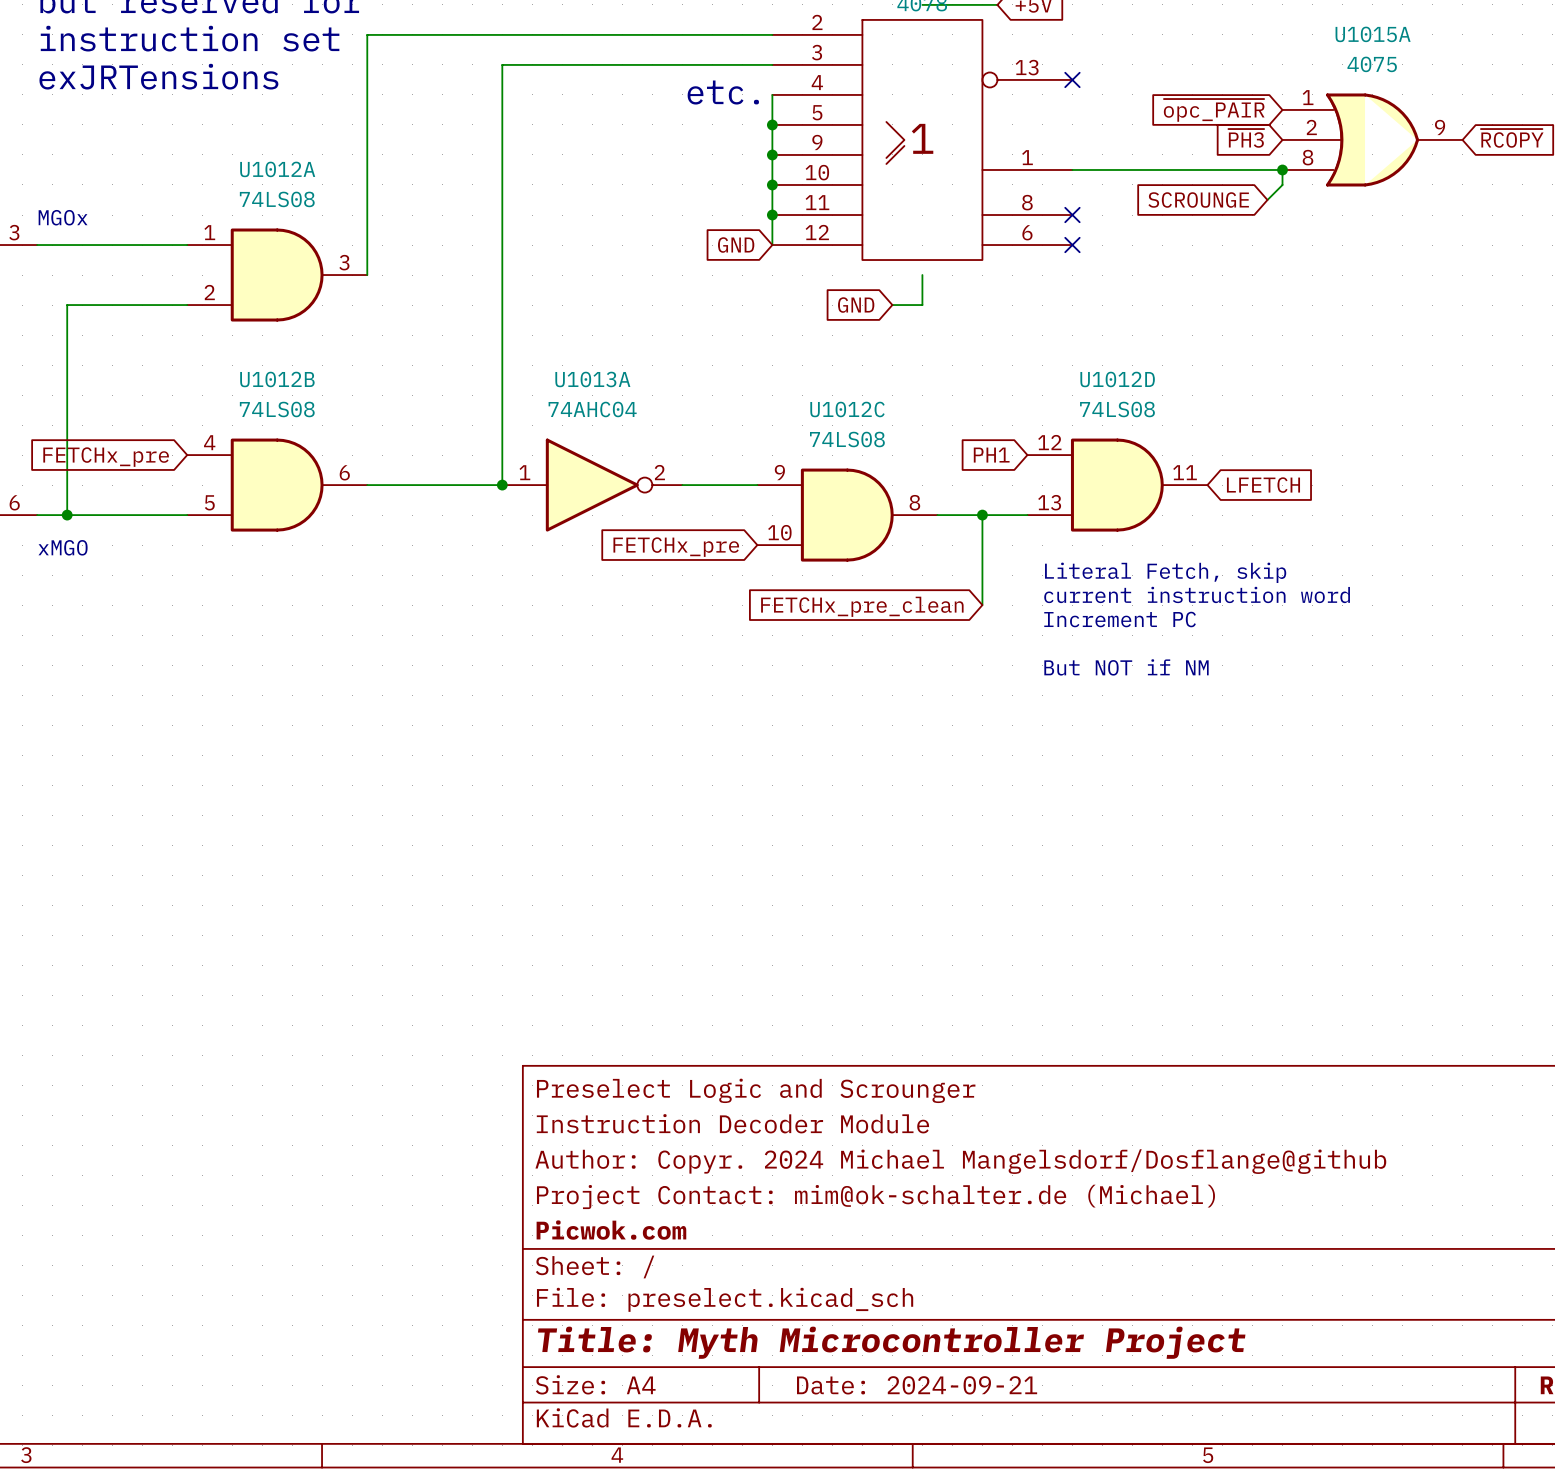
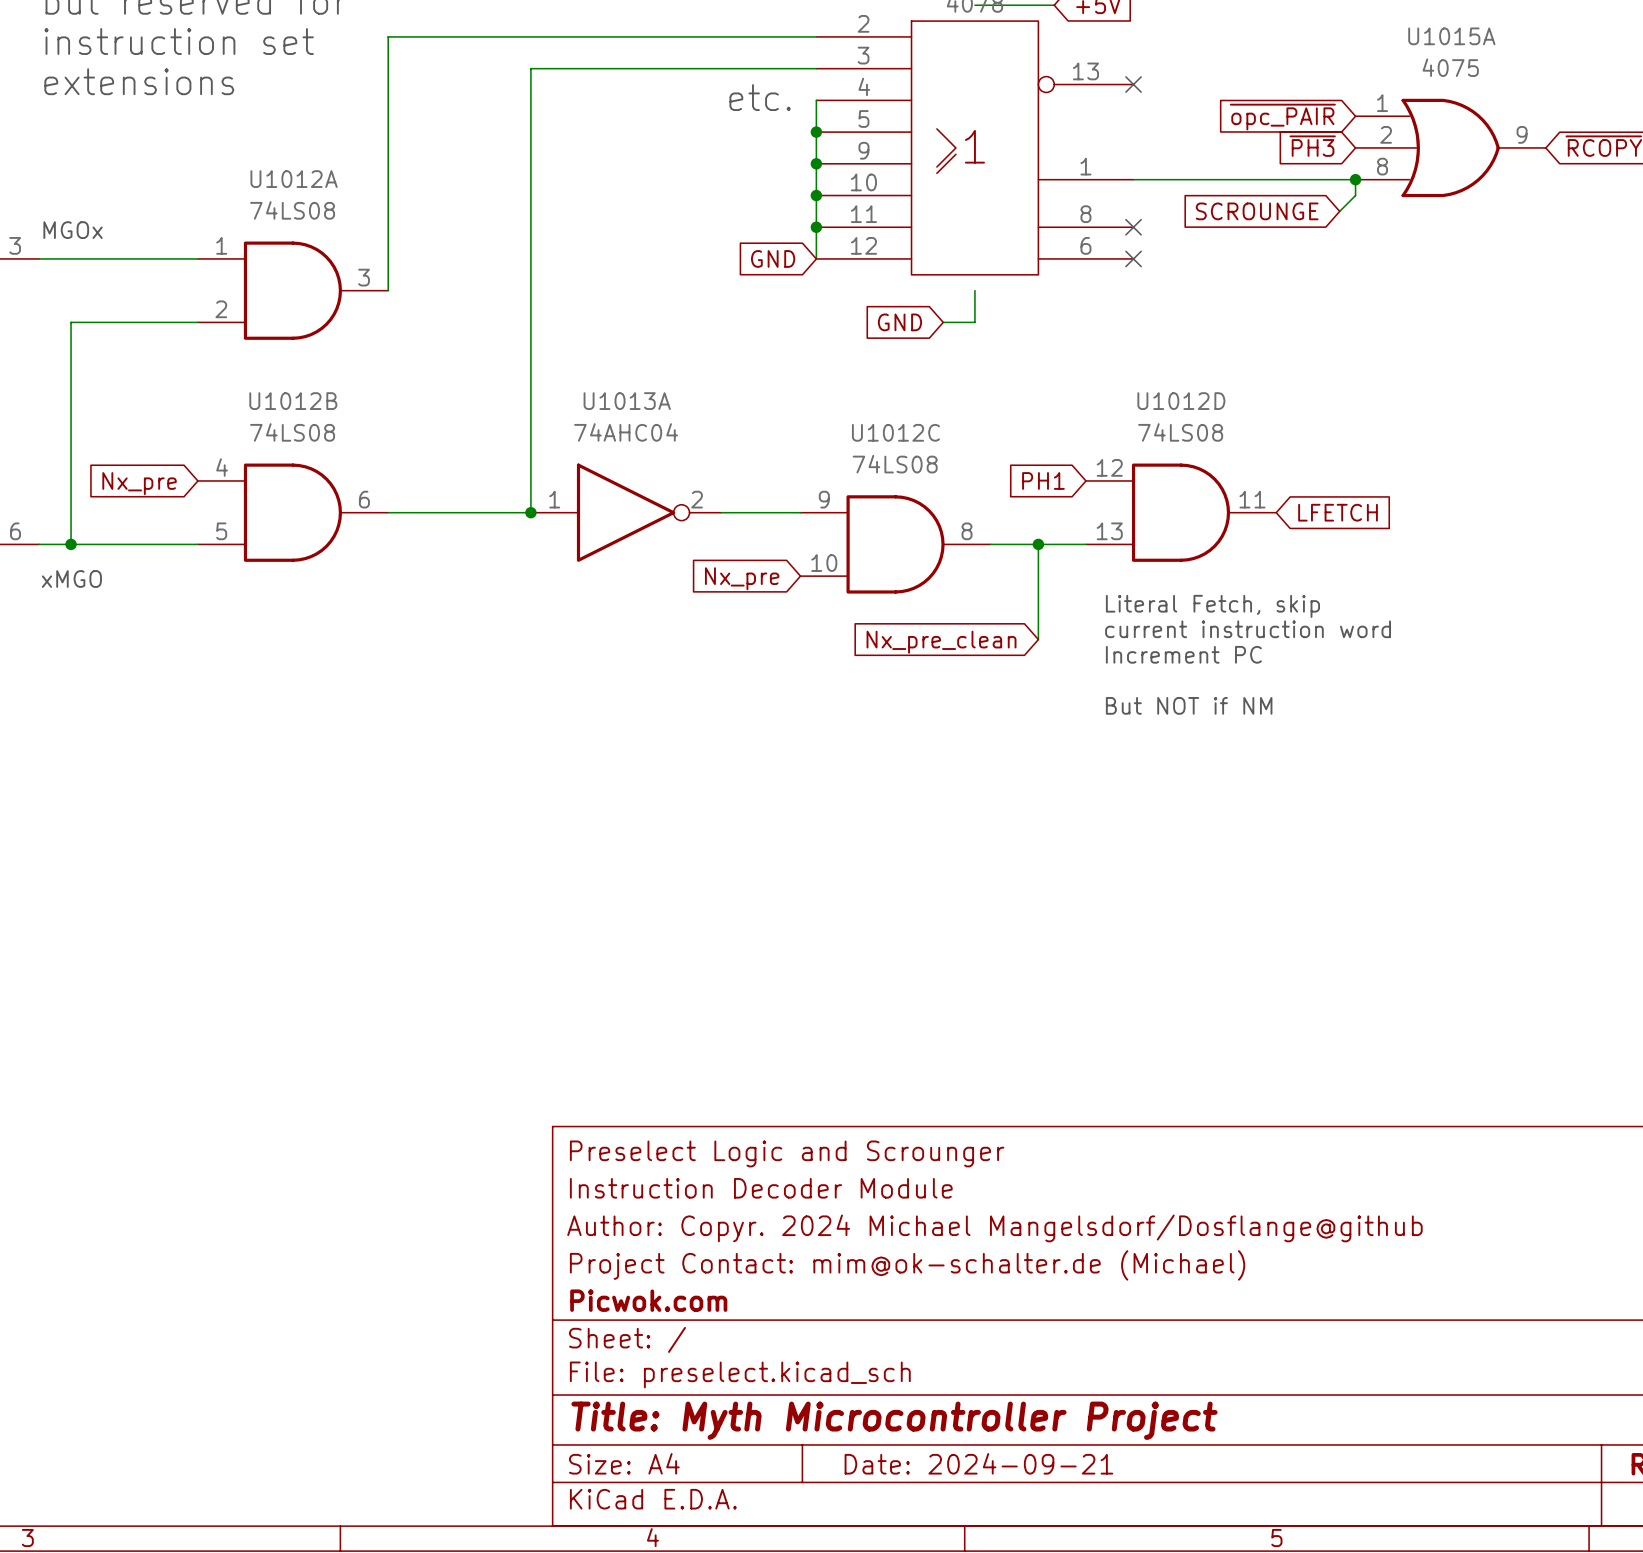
text: exJRTensions (158, 76) -> extensions (139, 81)
global label: FETCHx_pre (106, 457) -> Nx_pre (139, 483)
global label: FETCHx_pre (676, 547) -> Nx_pre (742, 578)
global label: FETCHx_pre_clean (862, 606) -> Nx_pre_clean (941, 642)

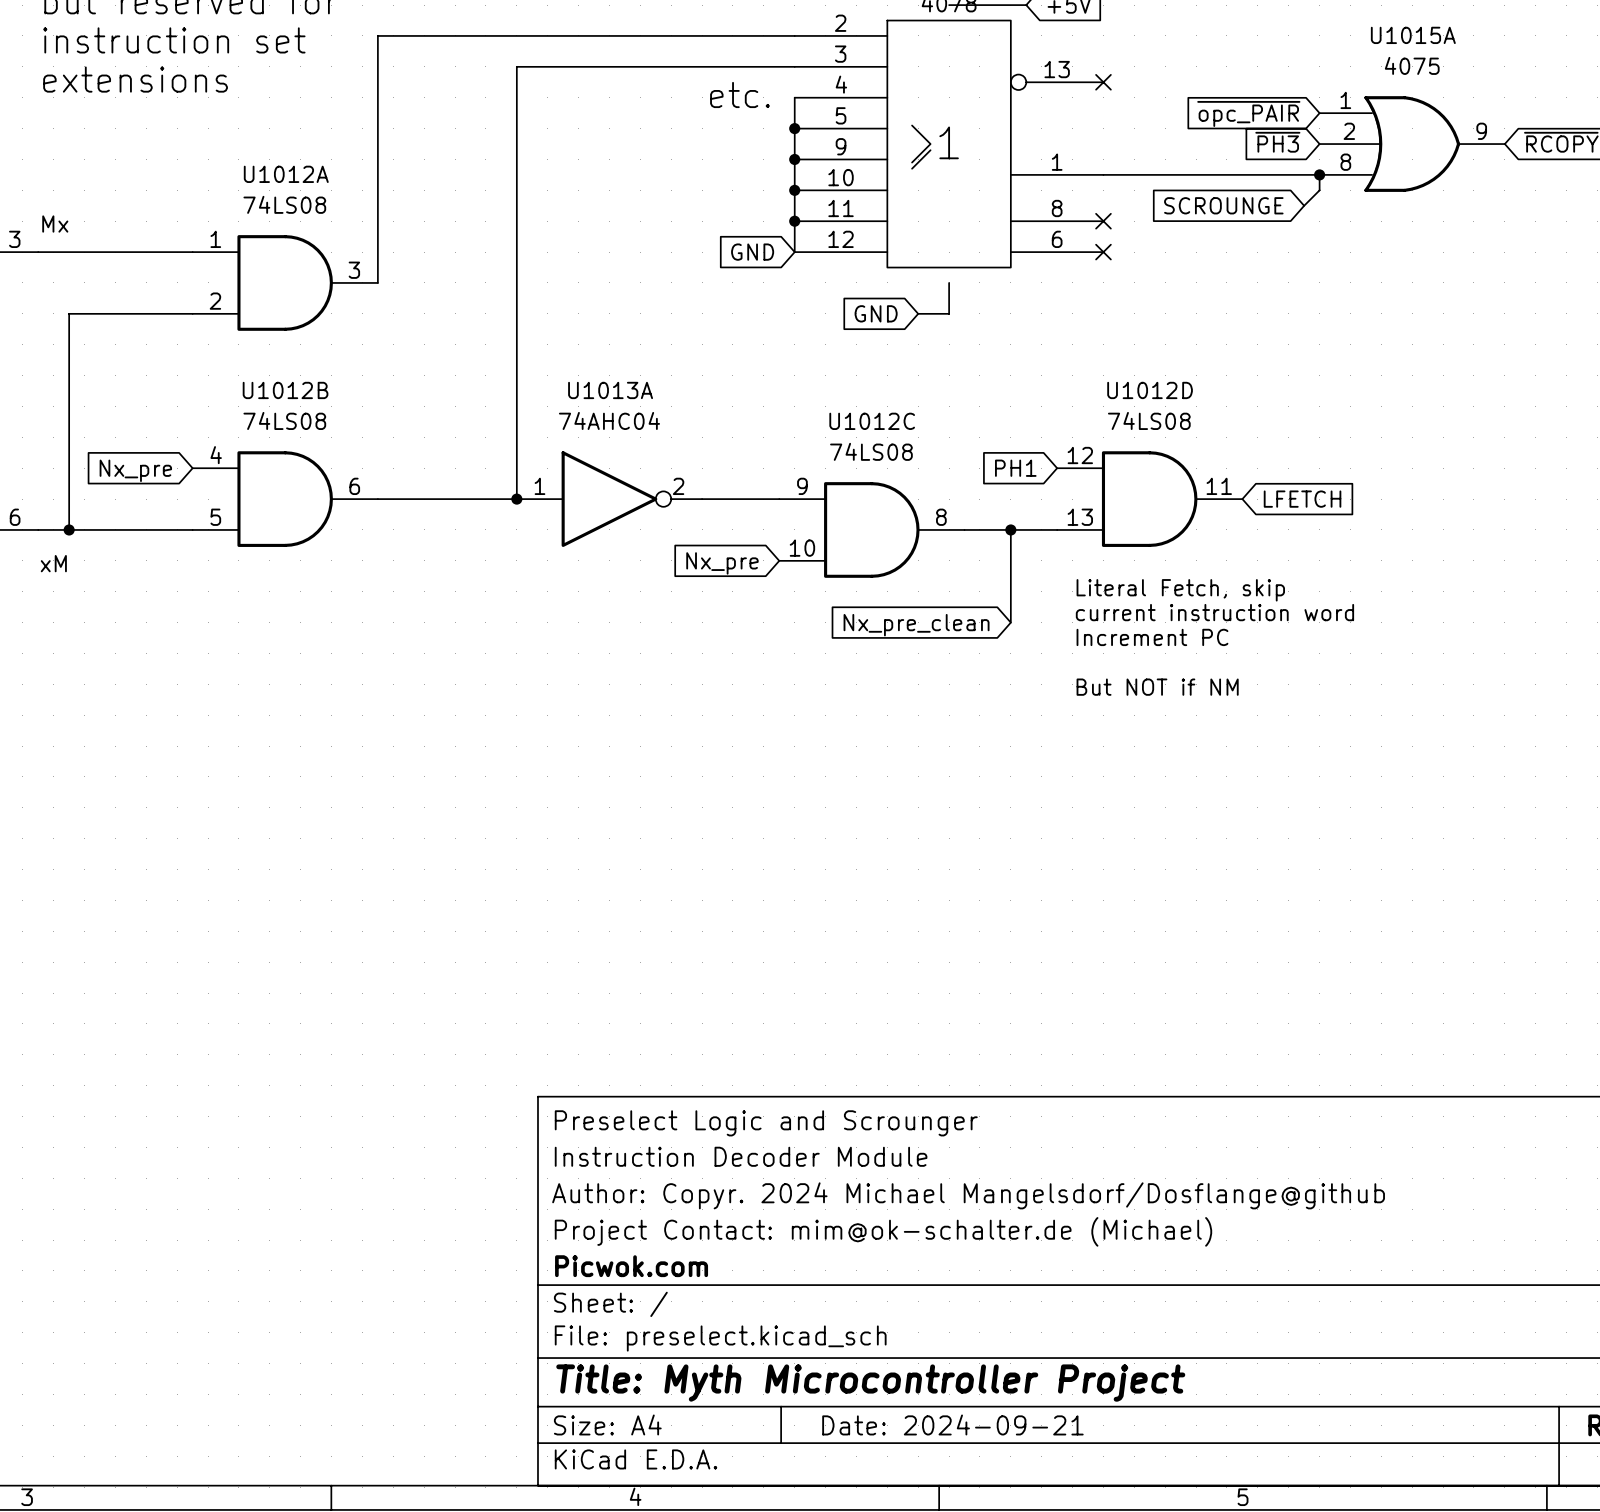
text: MGOx (73, 230) -> Mx (55, 224)
text: xMGO (71, 579) -> xM (53, 563)

